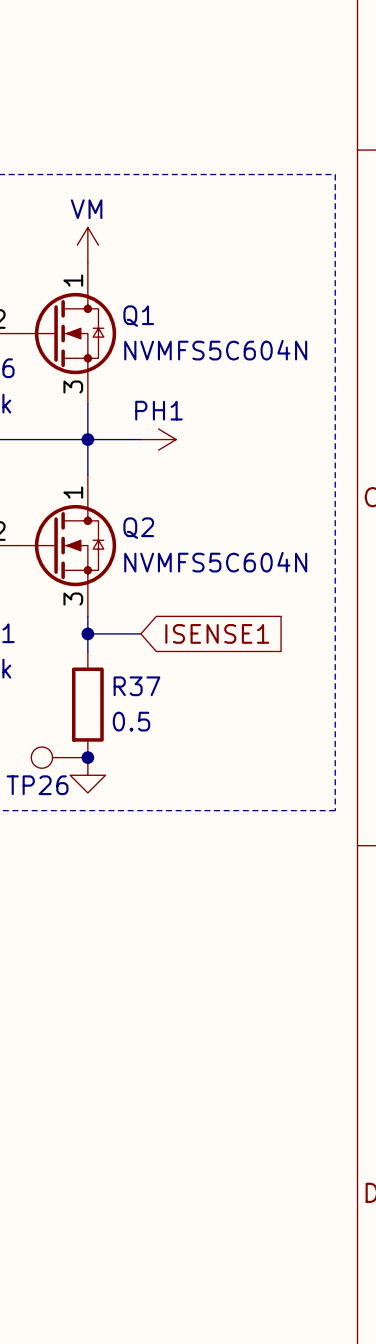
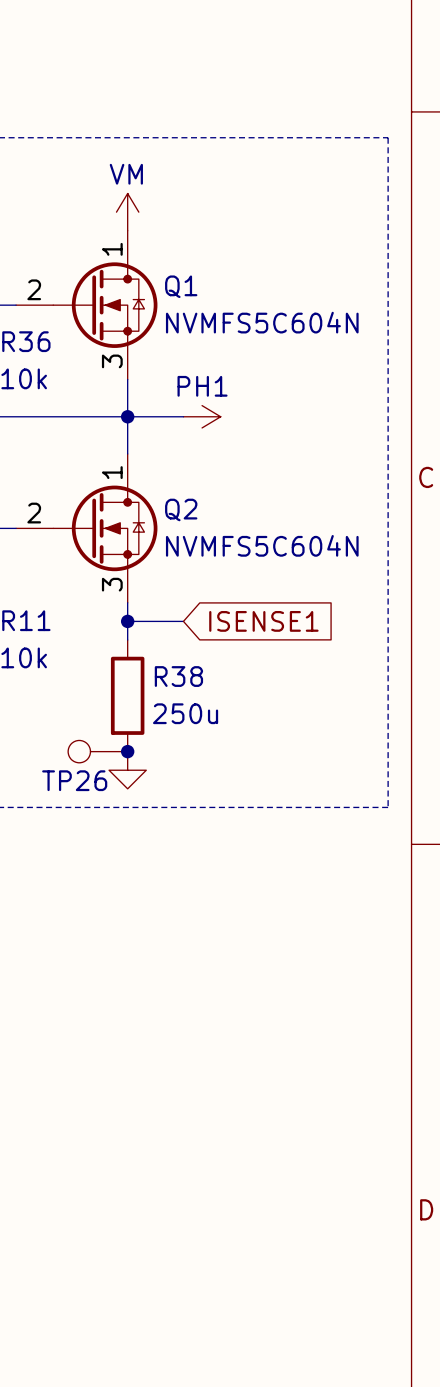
R37 name: R37 (136, 686) -> R38 (178, 676)
R37 value: 0.5 (131, 721) -> 250u (185, 713)

